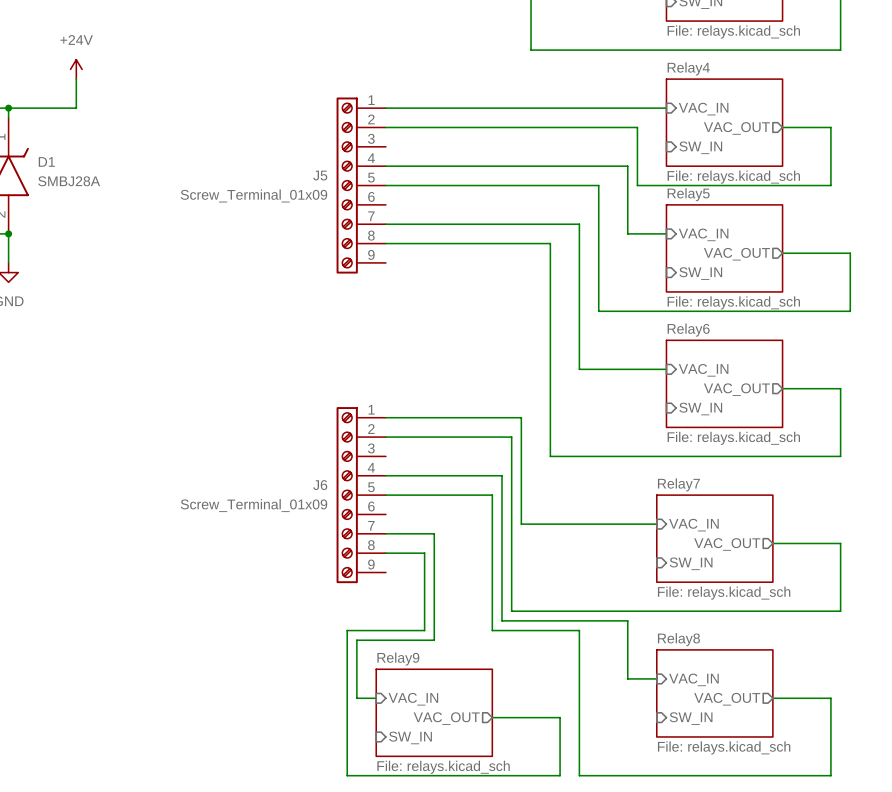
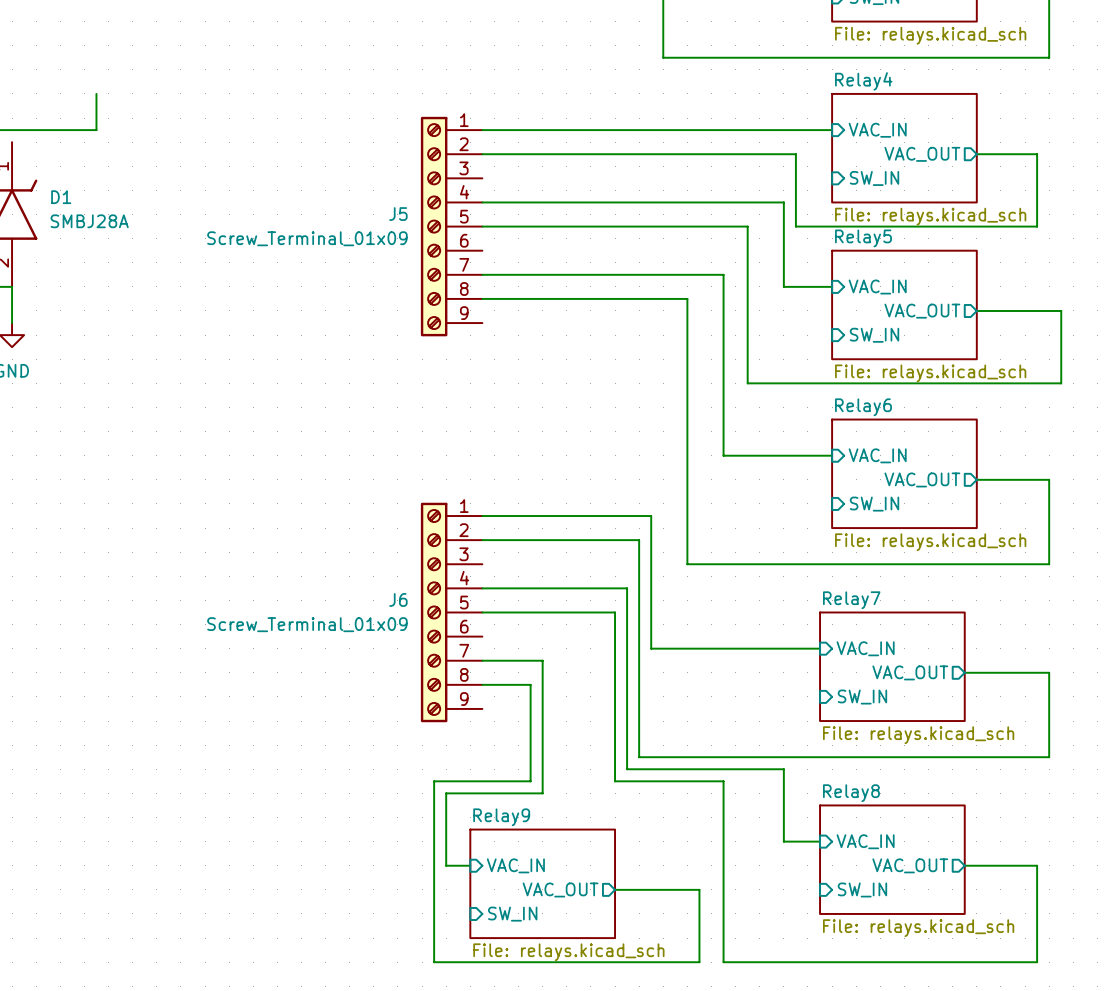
power symbol: +24V (76, 69) -> none
wire: (8, 108) (8, 117) -> none
junction: (8, 108) -> none
junction: (8, 233) -> none

